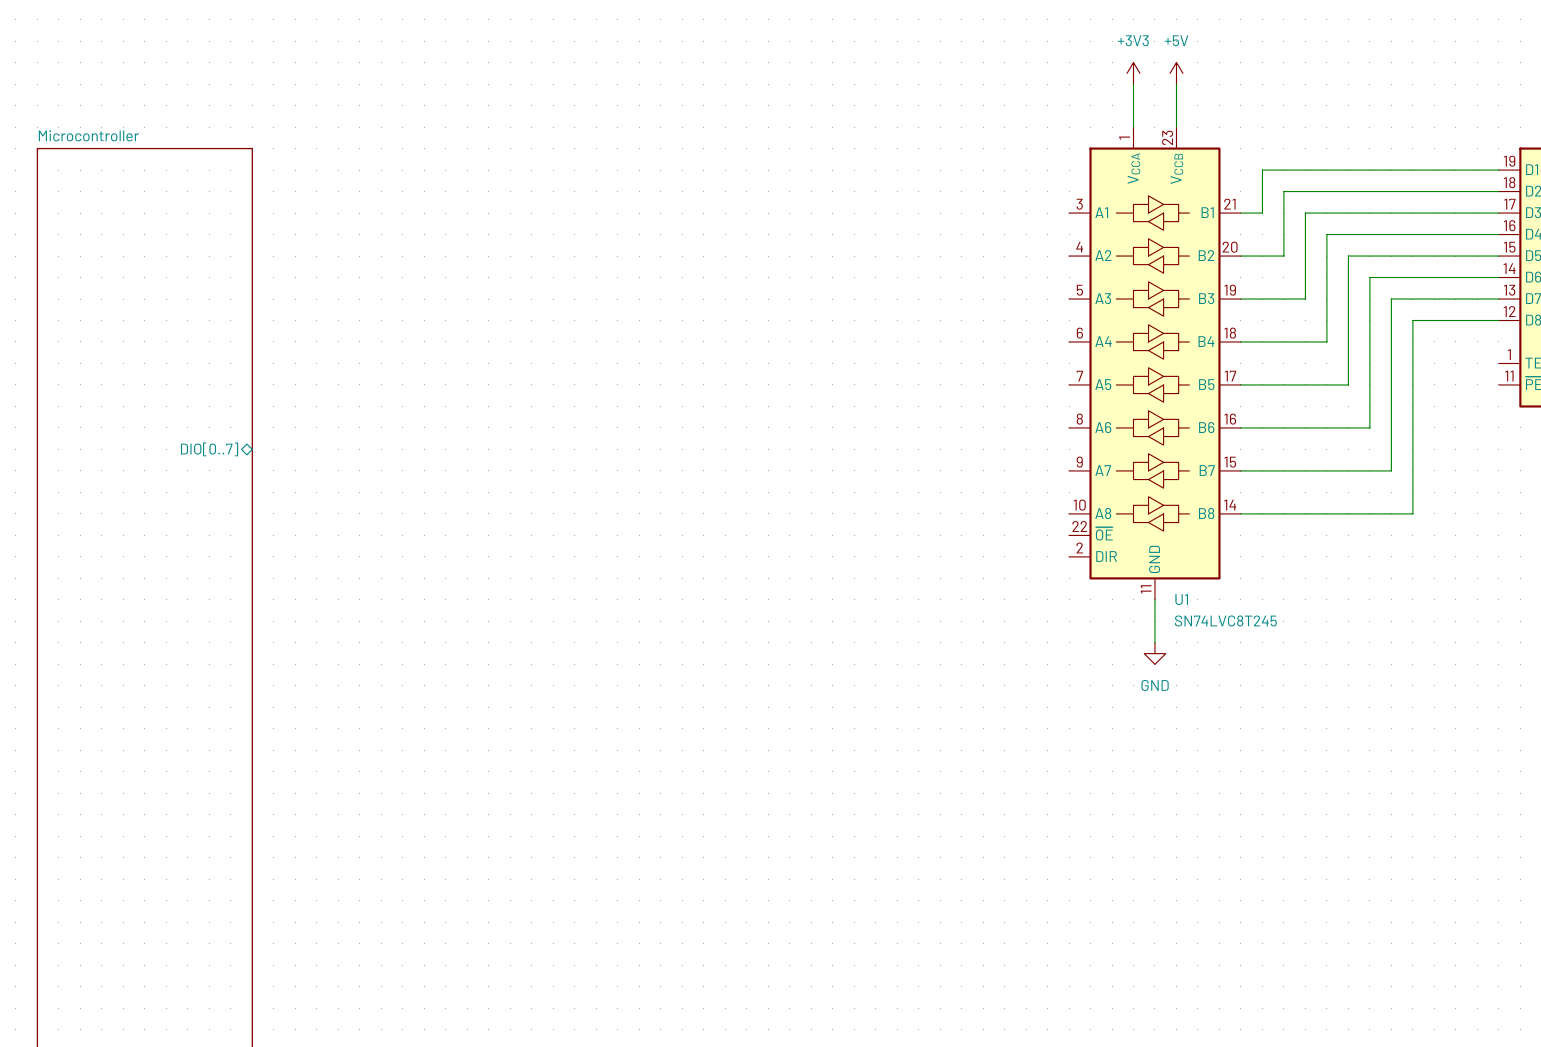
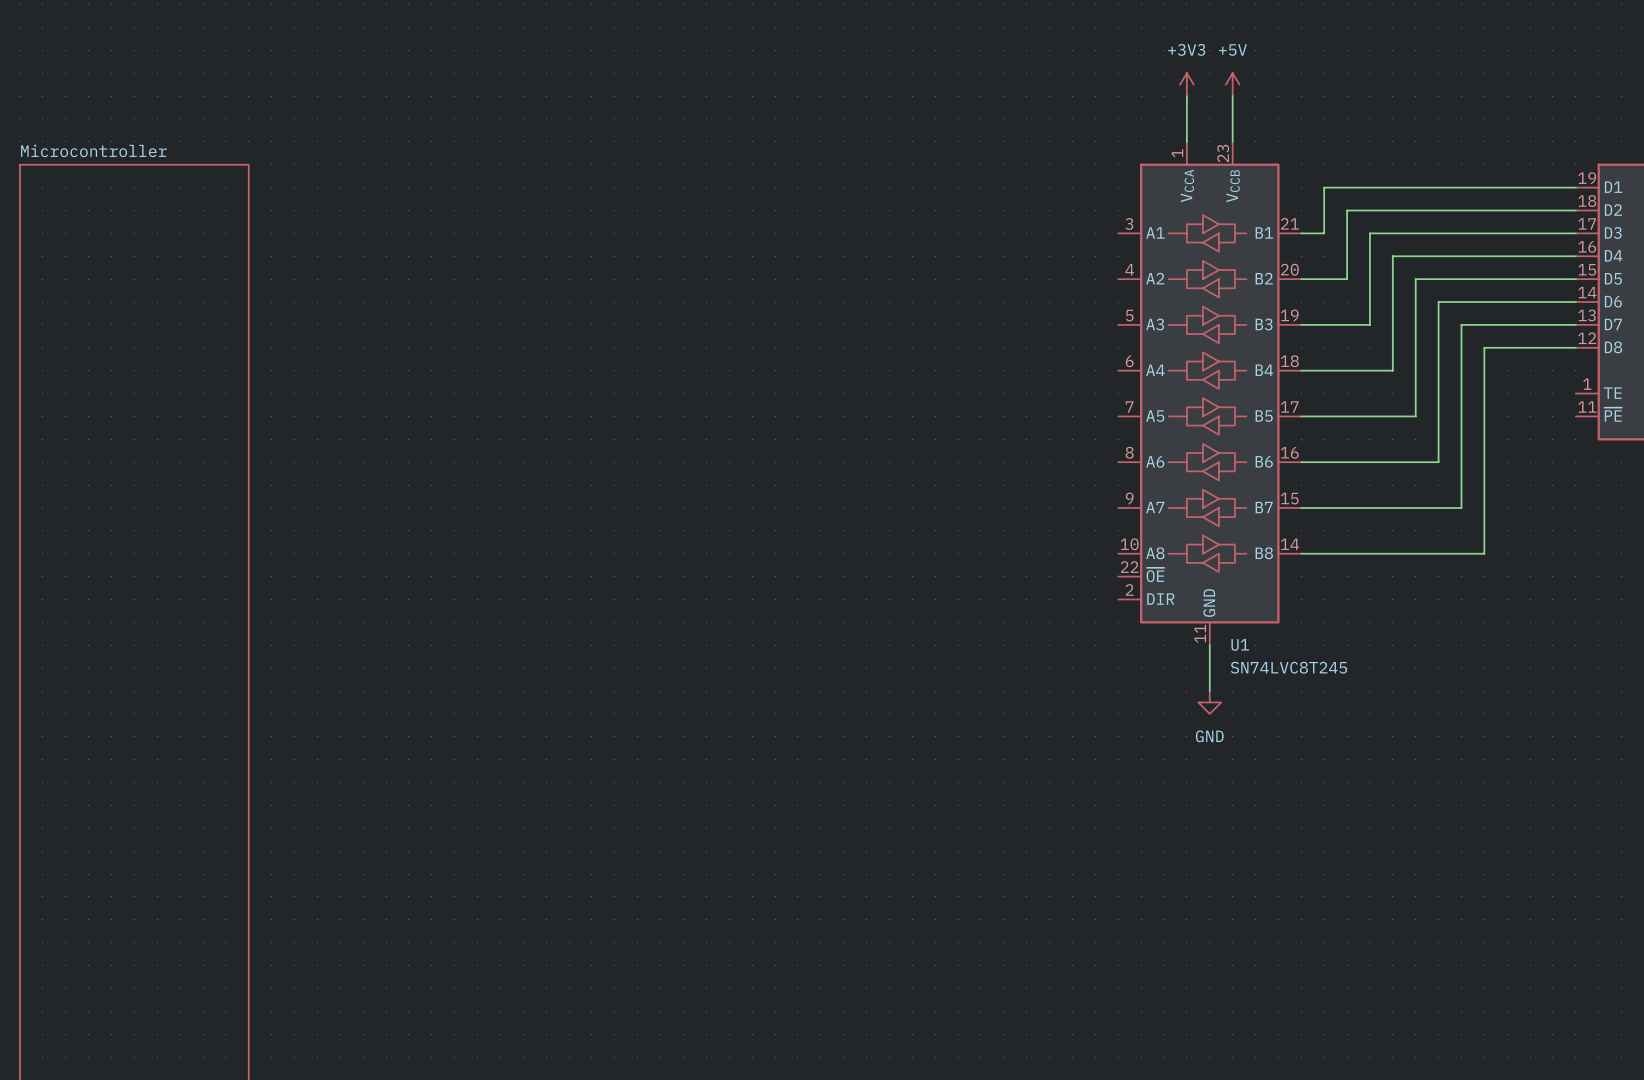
sheet pin: DIO[0..7] (209, 449) -> none

